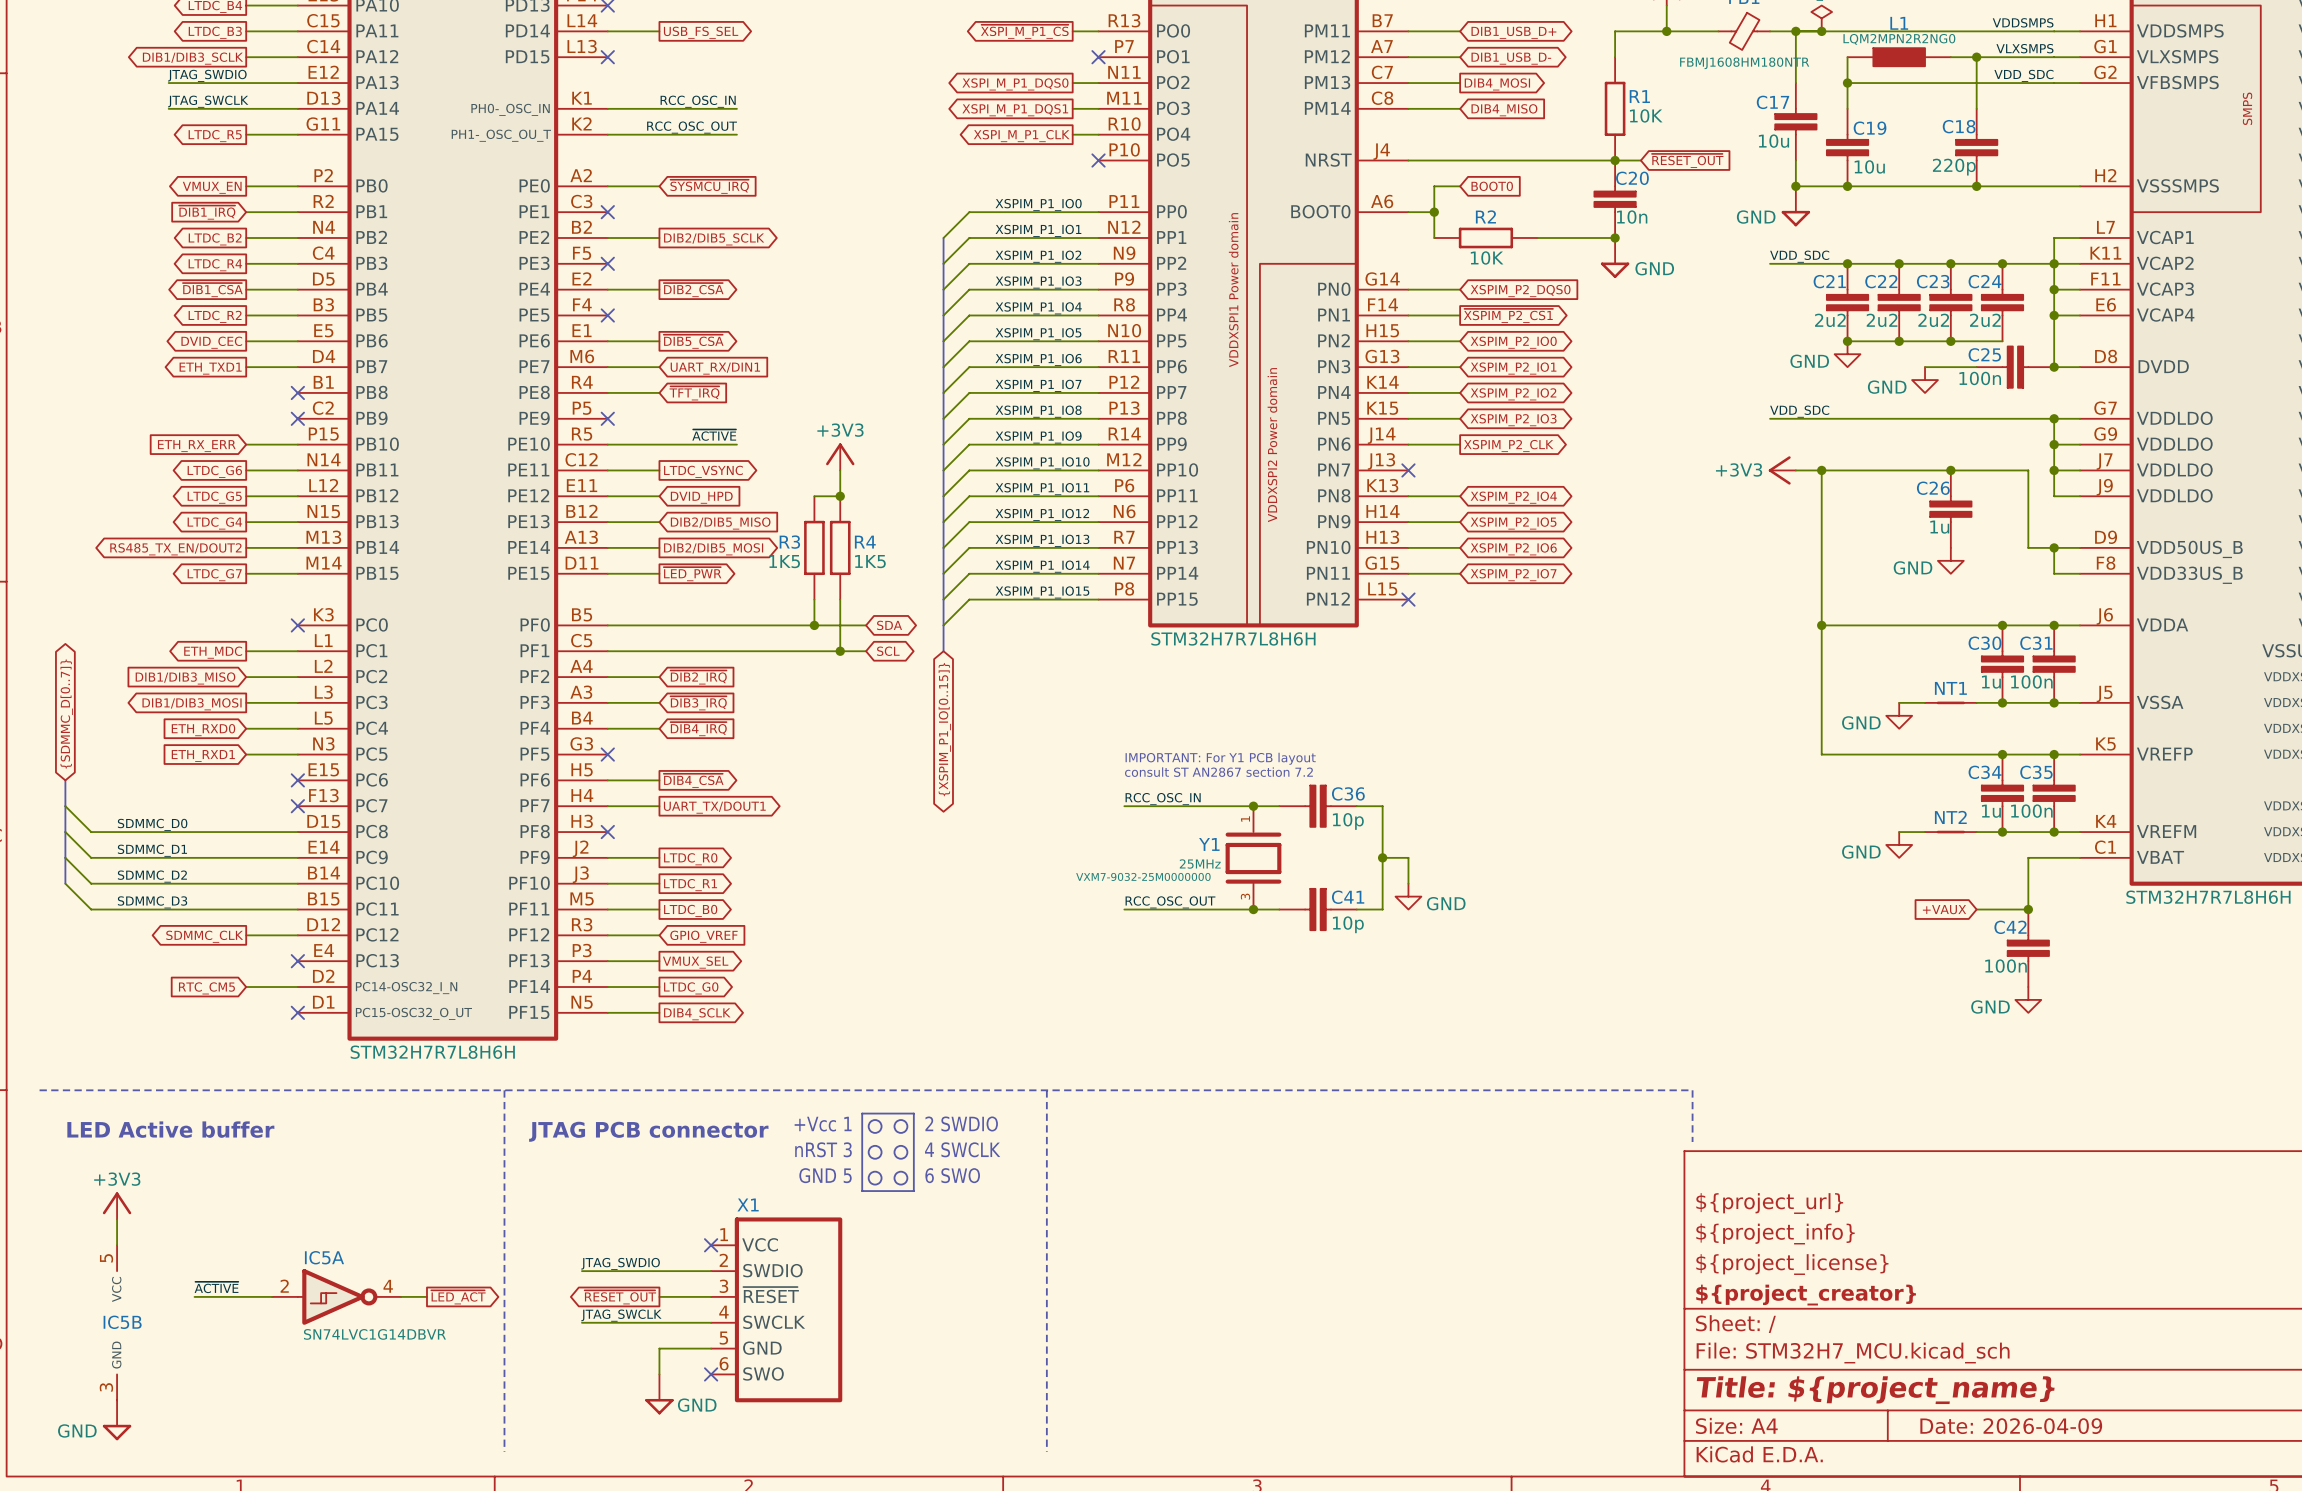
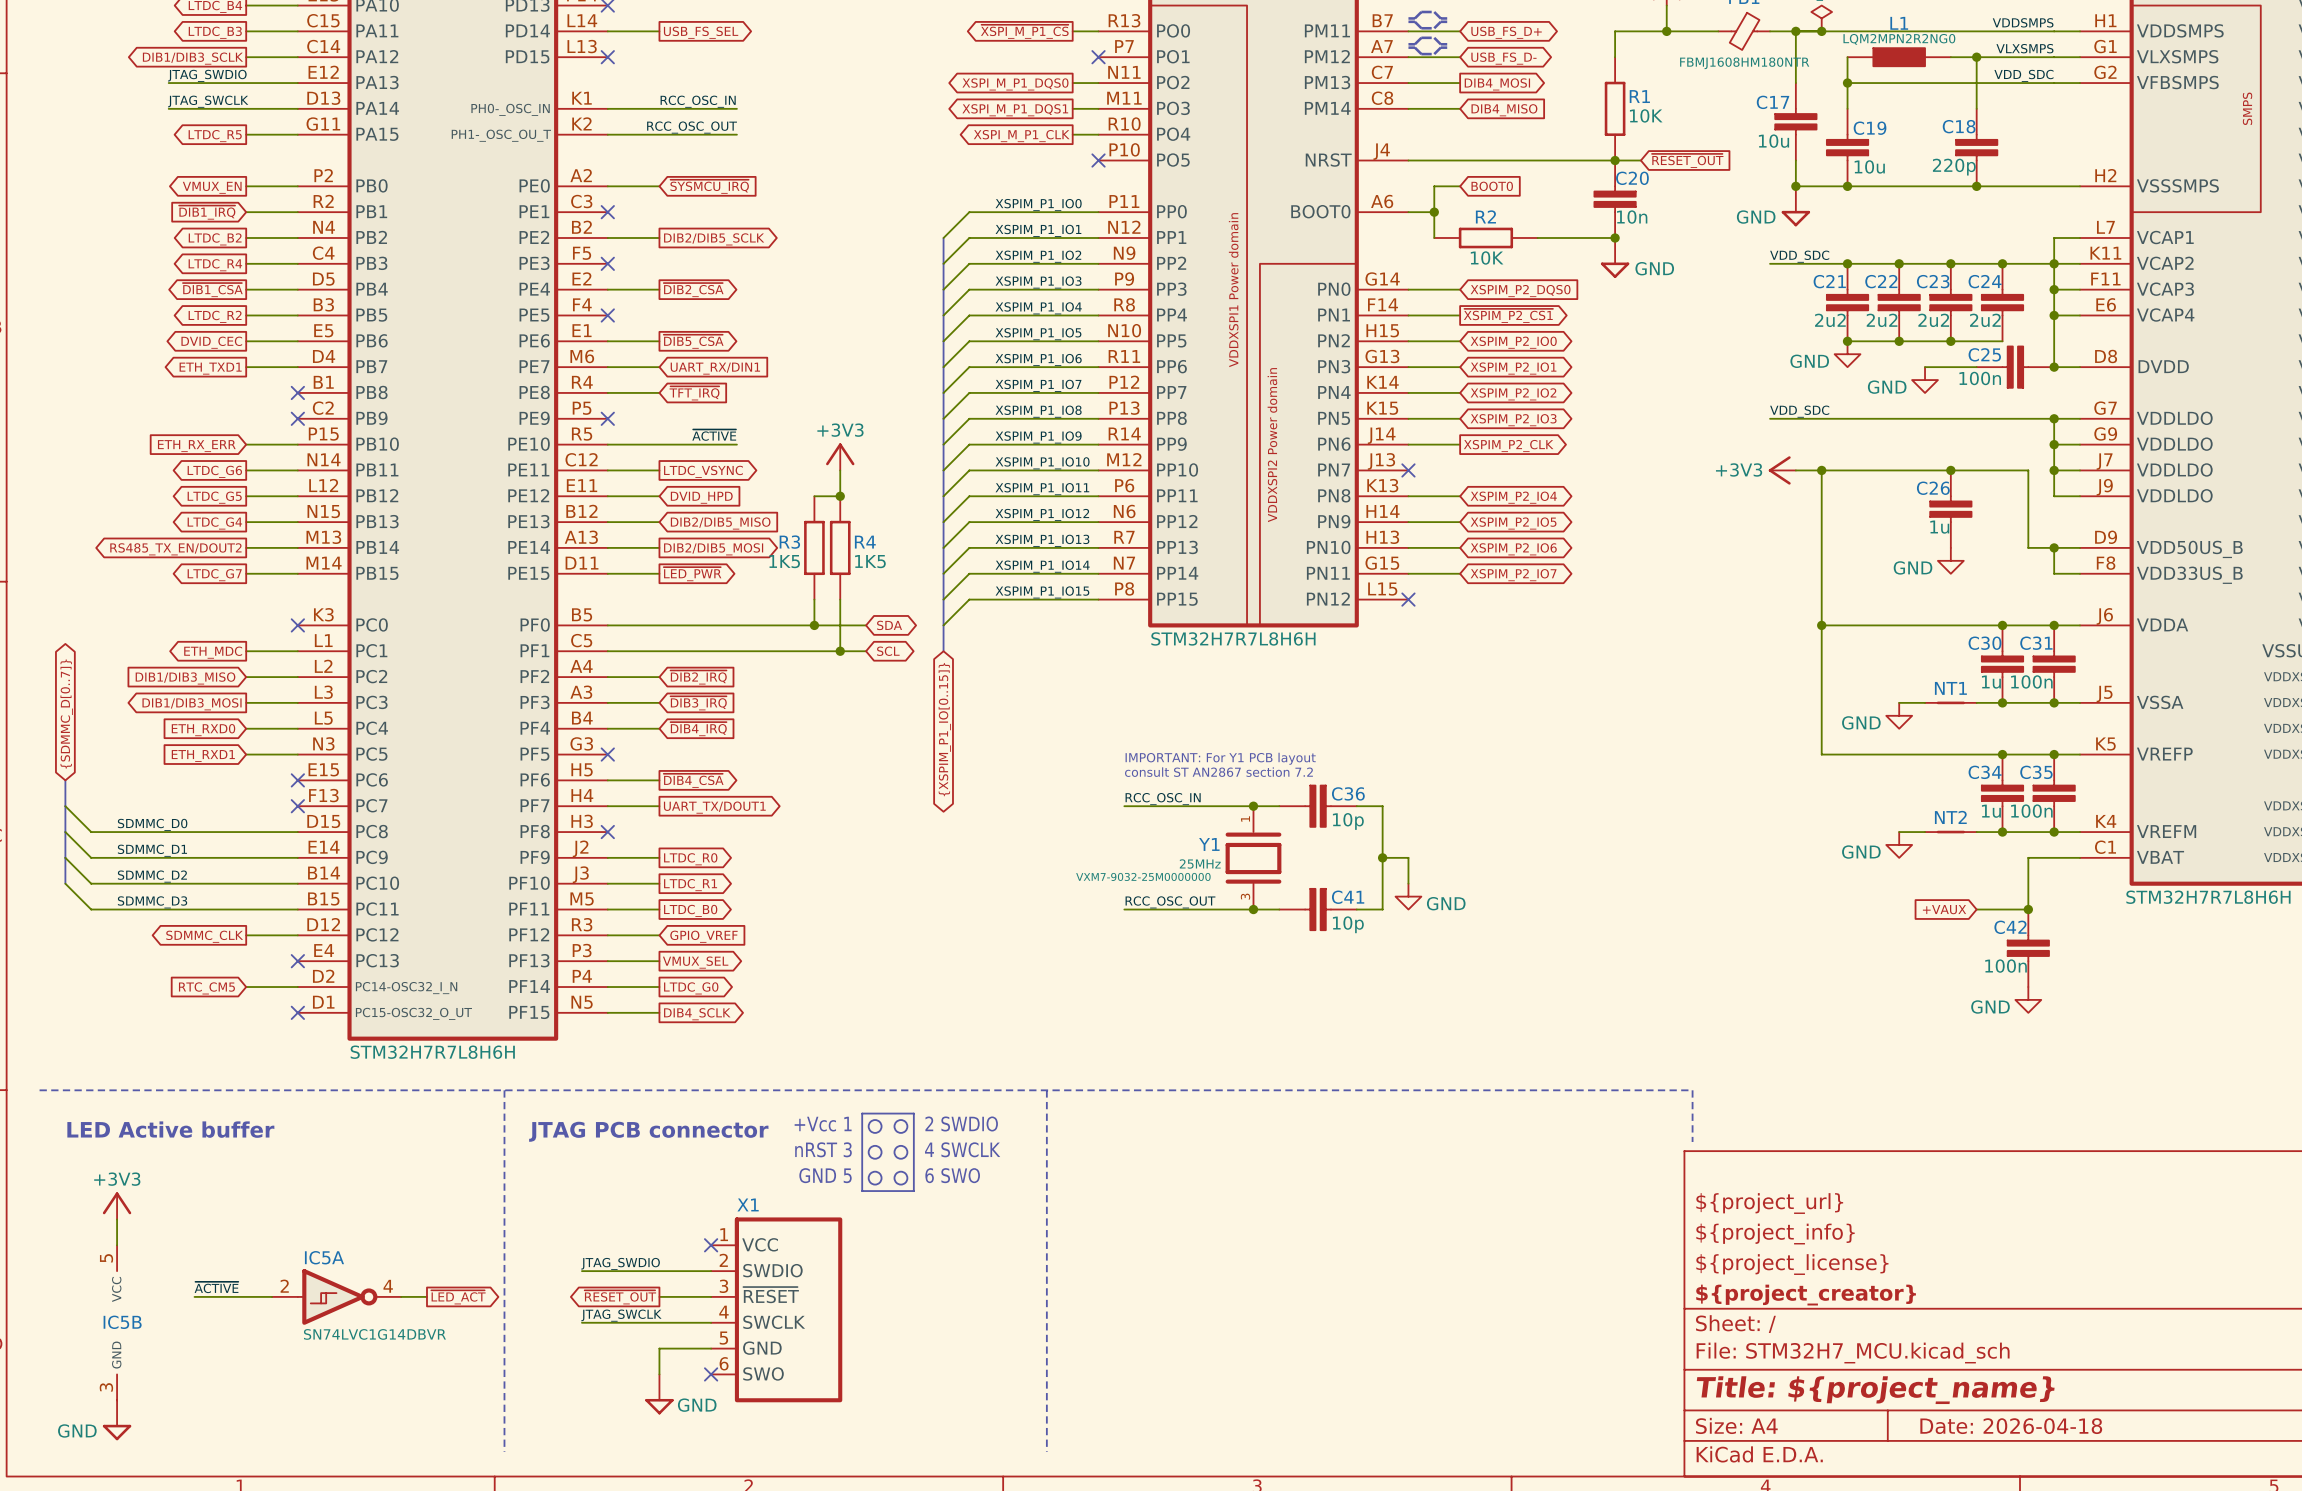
line: none -> (1408, 18) (1414, 18) (1421, 12) (1434, 12) (1440, 18) (1447, 18)
line: none -> (1408, 21) (1414, 21) (1421, 28) (1434, 28) (1440, 21) (1447, 21)
global label: DIB1_USB_D+ (1513, 32) -> USB_FS_D+ (1506, 32)
line: none -> (1408, 44) (1414, 44) (1421, 37) (1434, 37) (1440, 44) (1447, 44)
line: none -> (1408, 47) (1414, 47) (1421, 54) (1434, 54) (1440, 47) (1447, 47)
global label: DIB1_USB_D- (1511, 58) -> USB_FS_D- (1503, 58)
title block: Date: 2026-04-09 (2011, 1426) -> Date: 2026-04-18 (2011, 1426)

